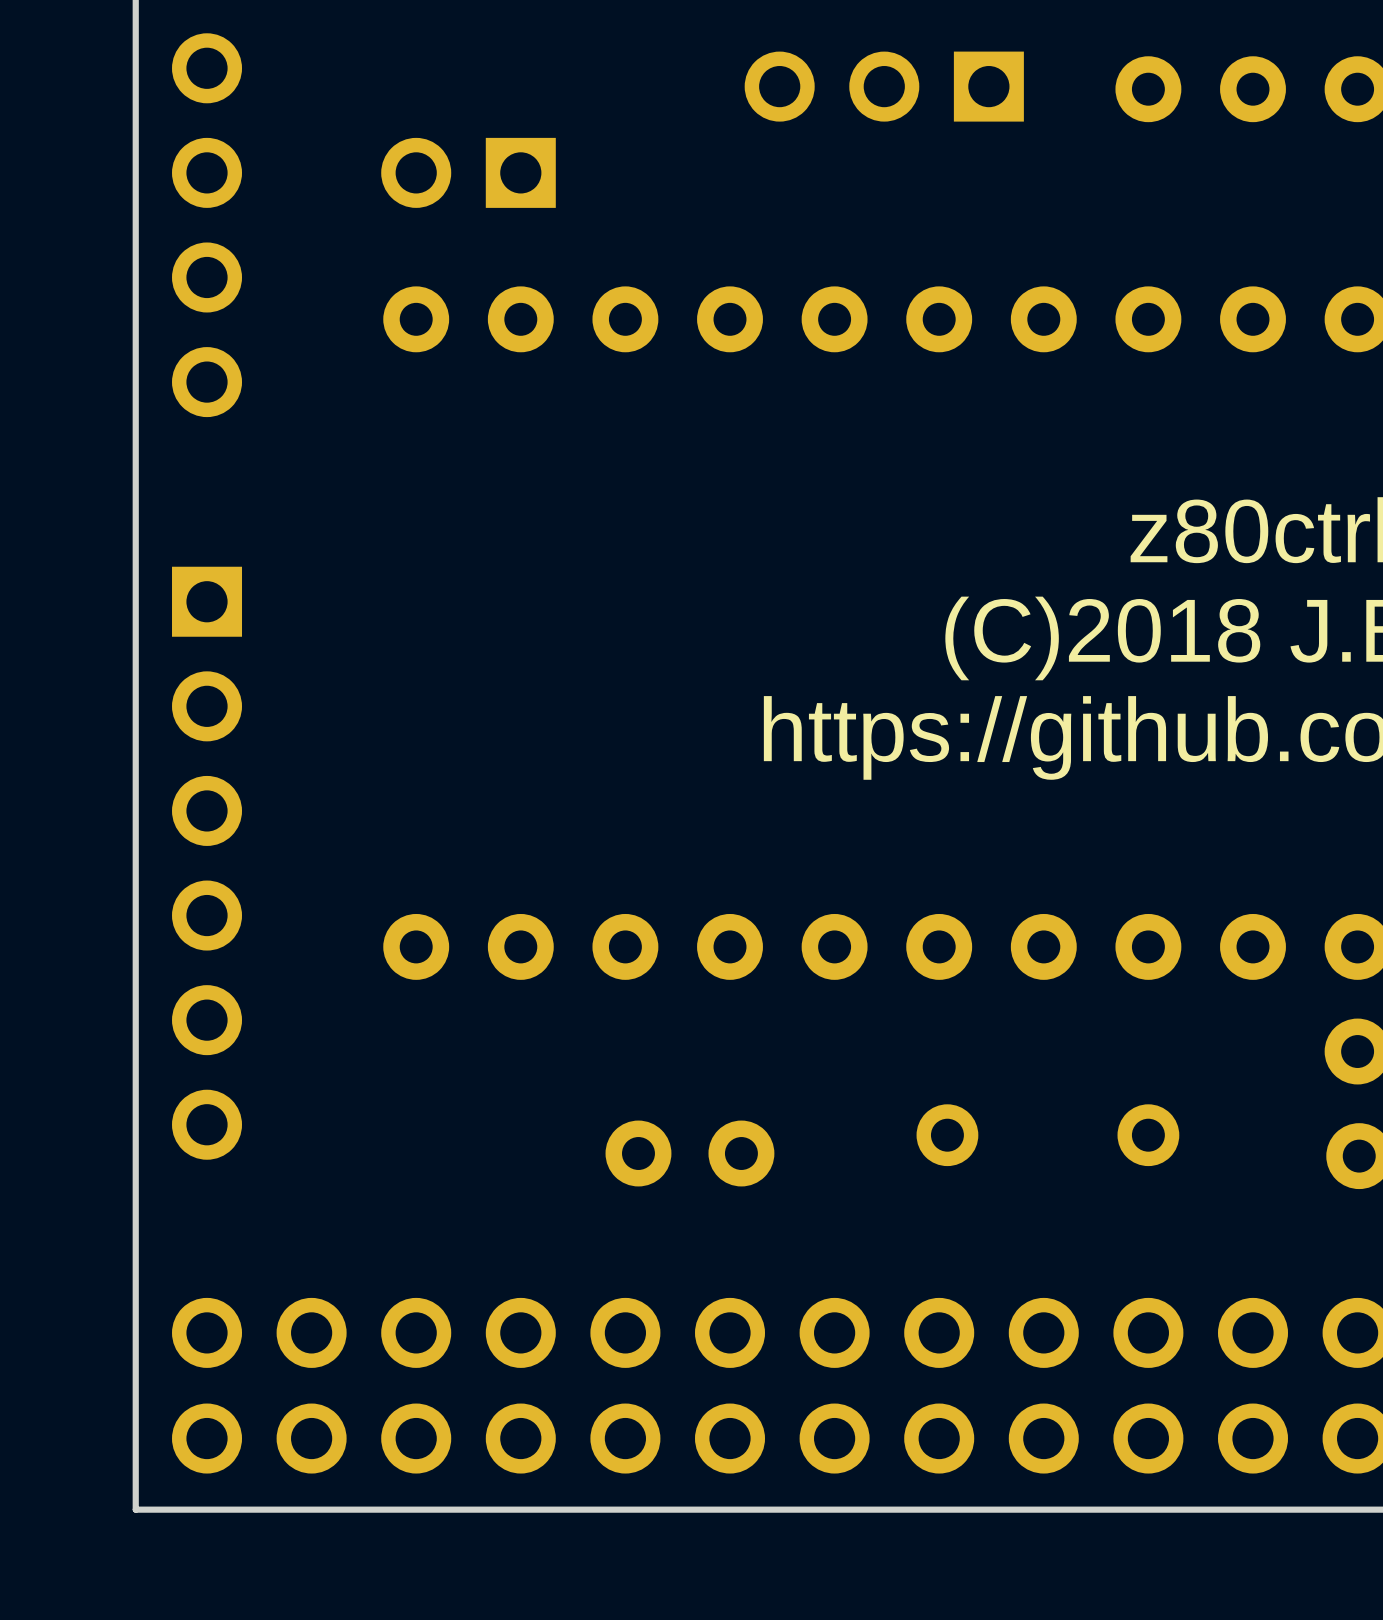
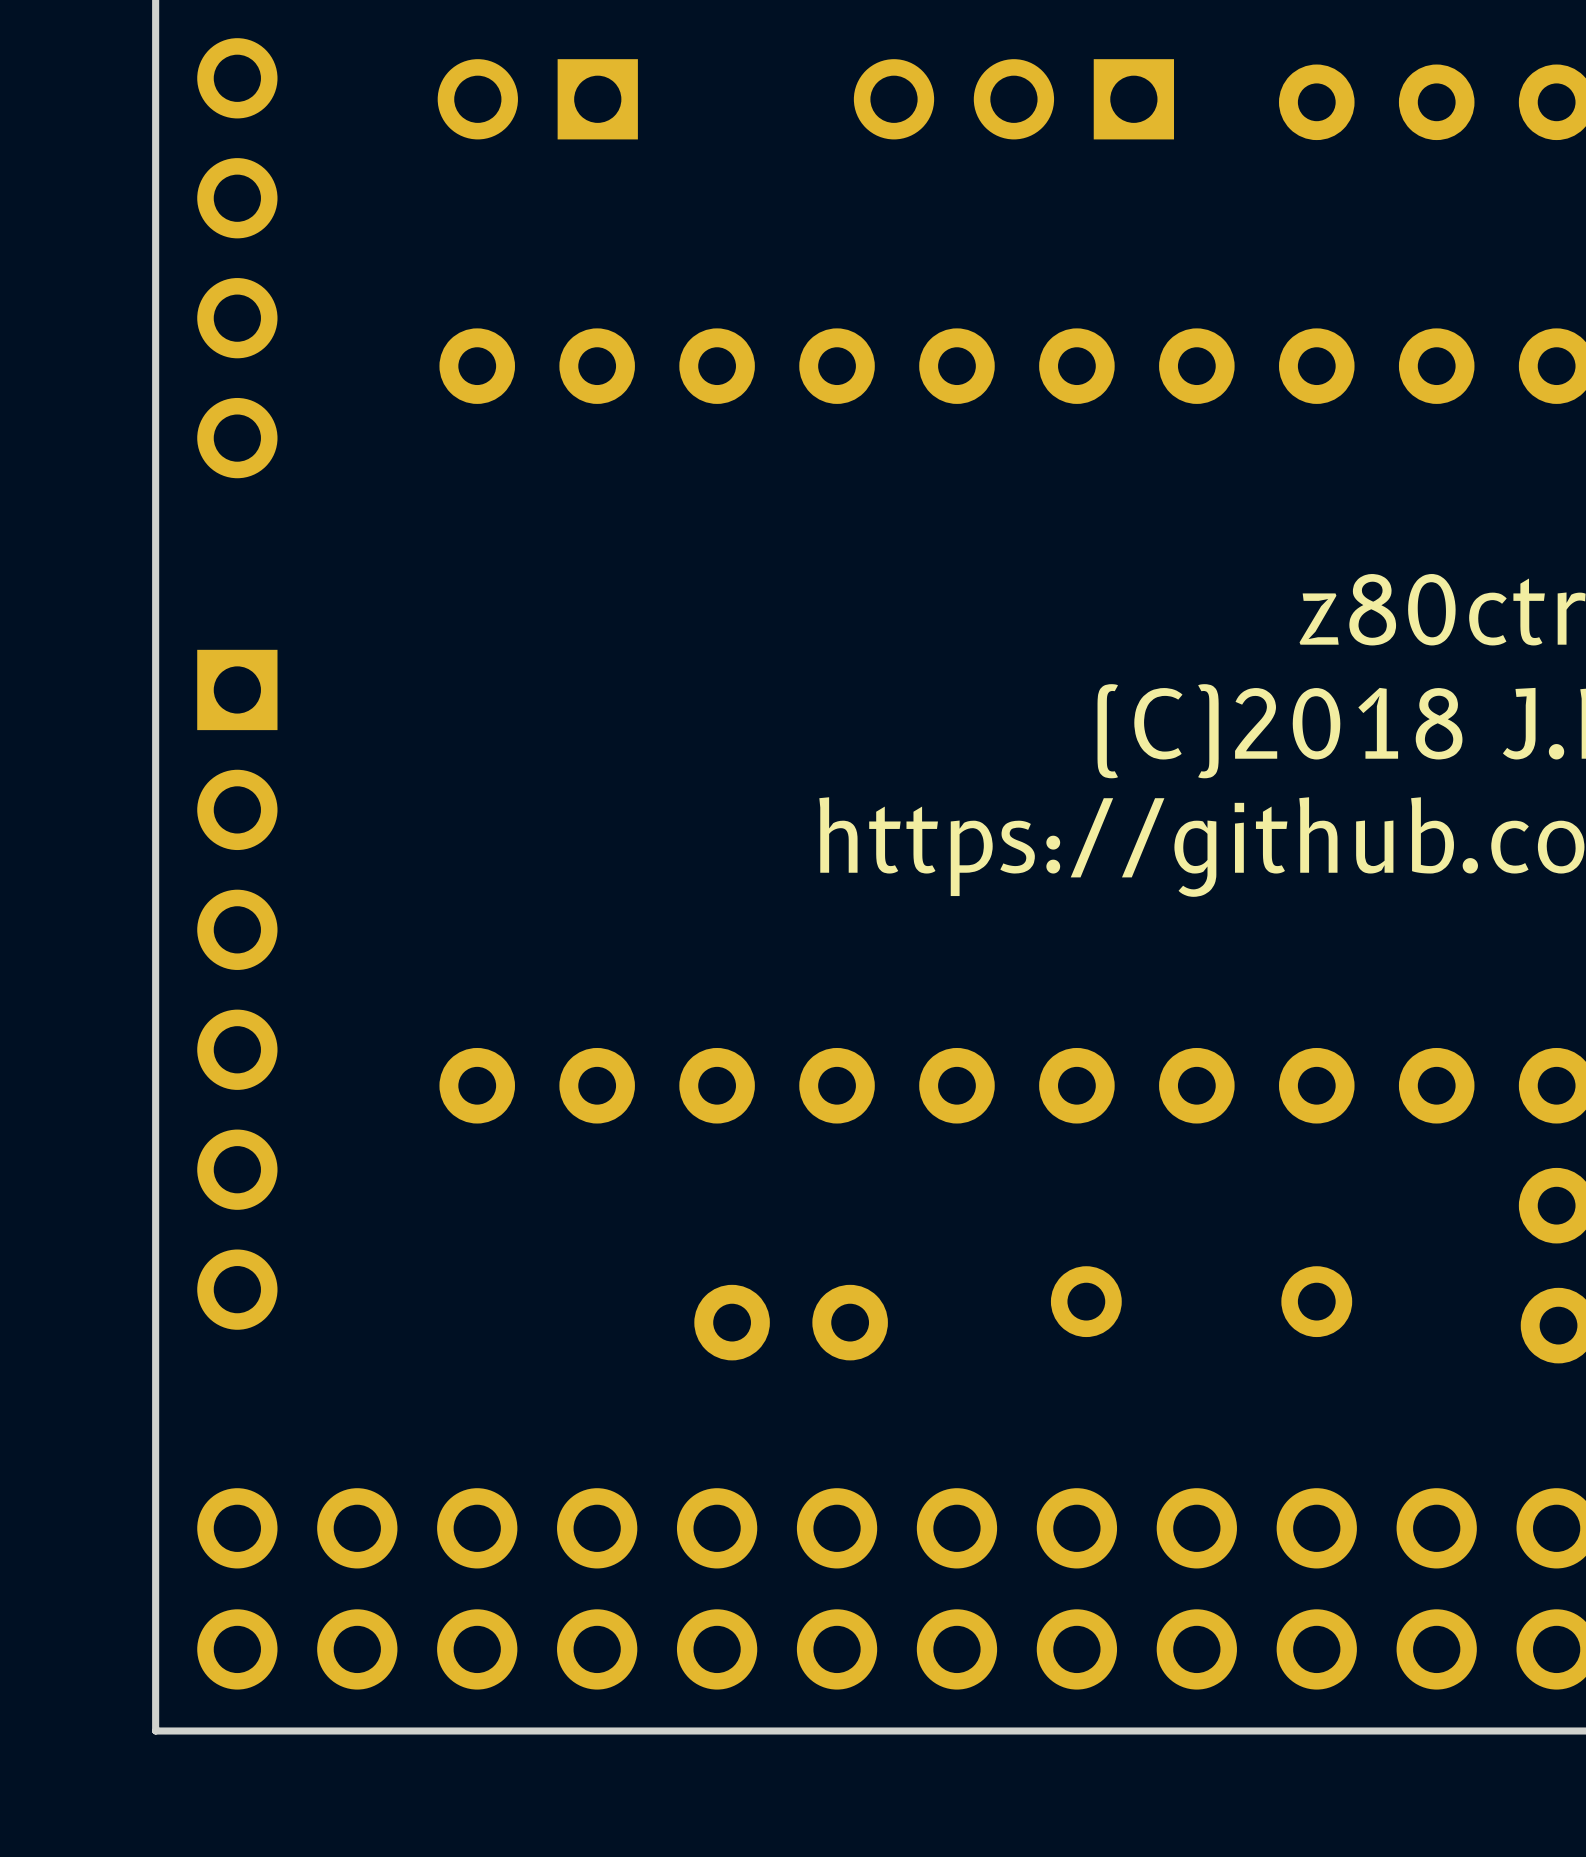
part position: (468, 172) -> (537, 99)

